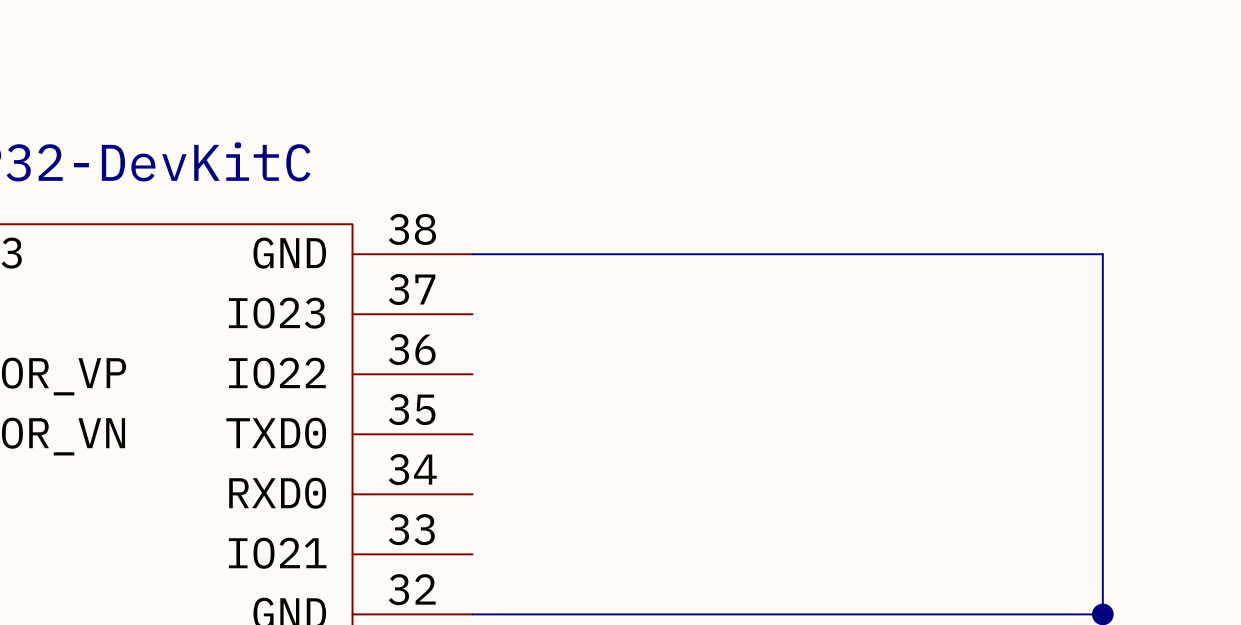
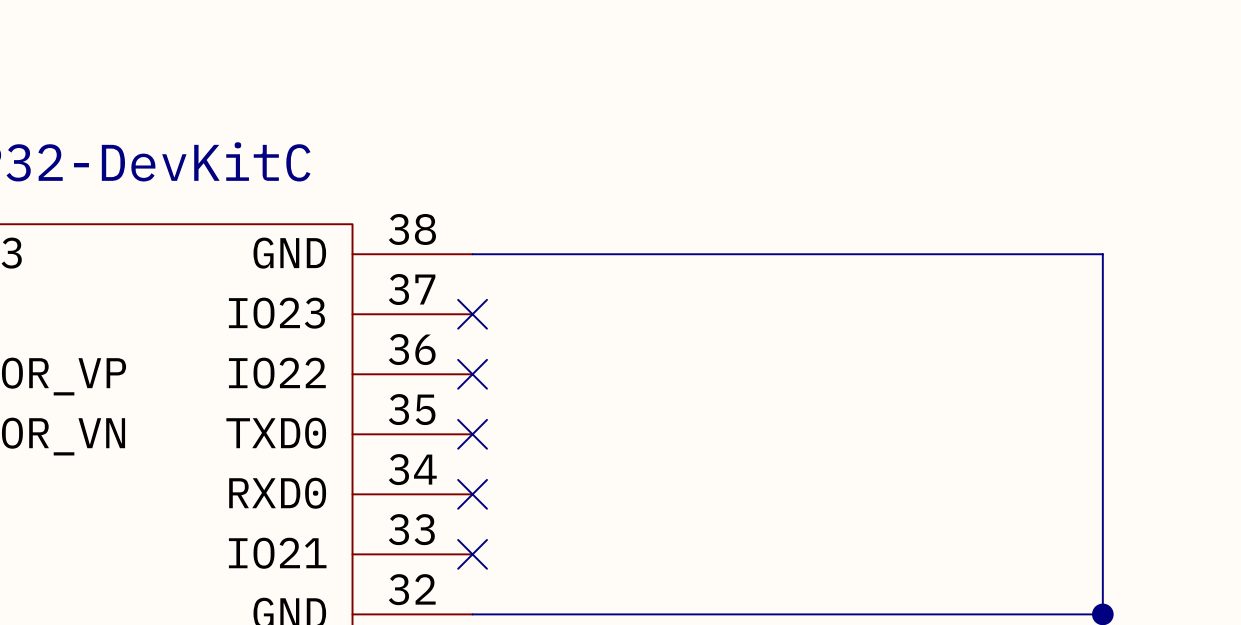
no-connect mark: none -> (472, 314)
no-connect mark: none -> (472, 374)
no-connect mark: none -> (472, 434)
no-connect mark: none -> (472, 494)
no-connect mark: none -> (472, 554)

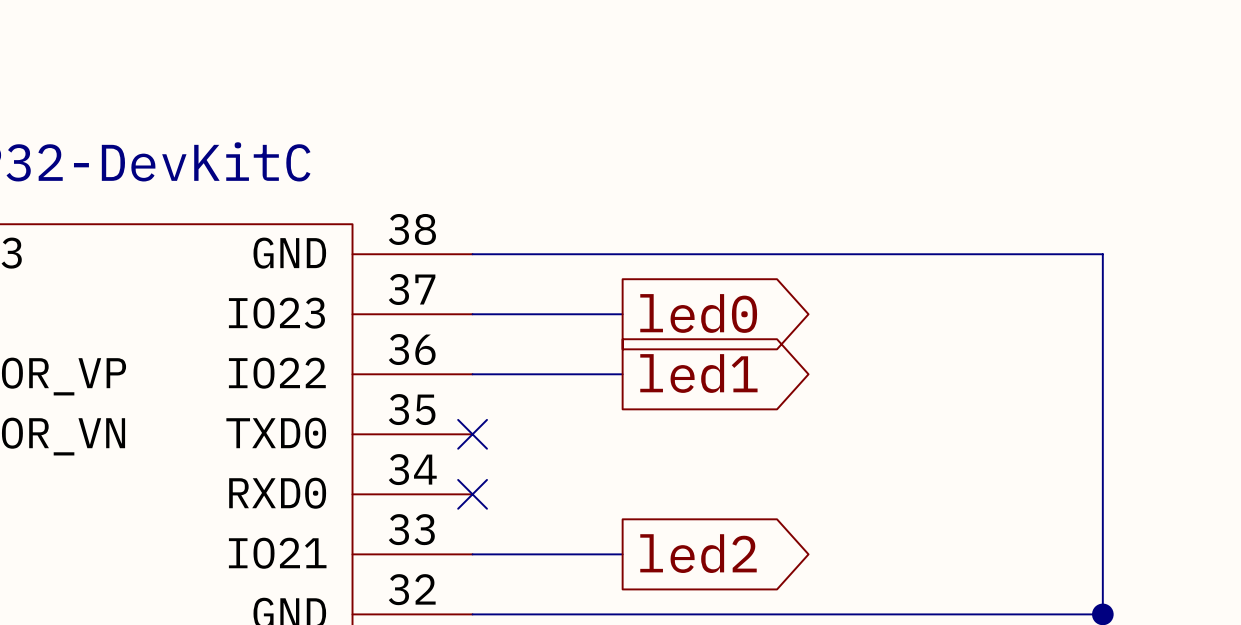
global label: none -> led0 (698, 313)
wire: none -> (472, 314) (622, 314)
no-connect mark: (472, 314) -> none
global label: none -> led1 (698, 373)
wire: none -> (472, 374) (622, 374)
no-connect mark: (472, 374) -> none
global label: none -> led2 (698, 553)
wire: none -> (472, 554) (622, 554)
no-connect mark: (472, 554) -> none

